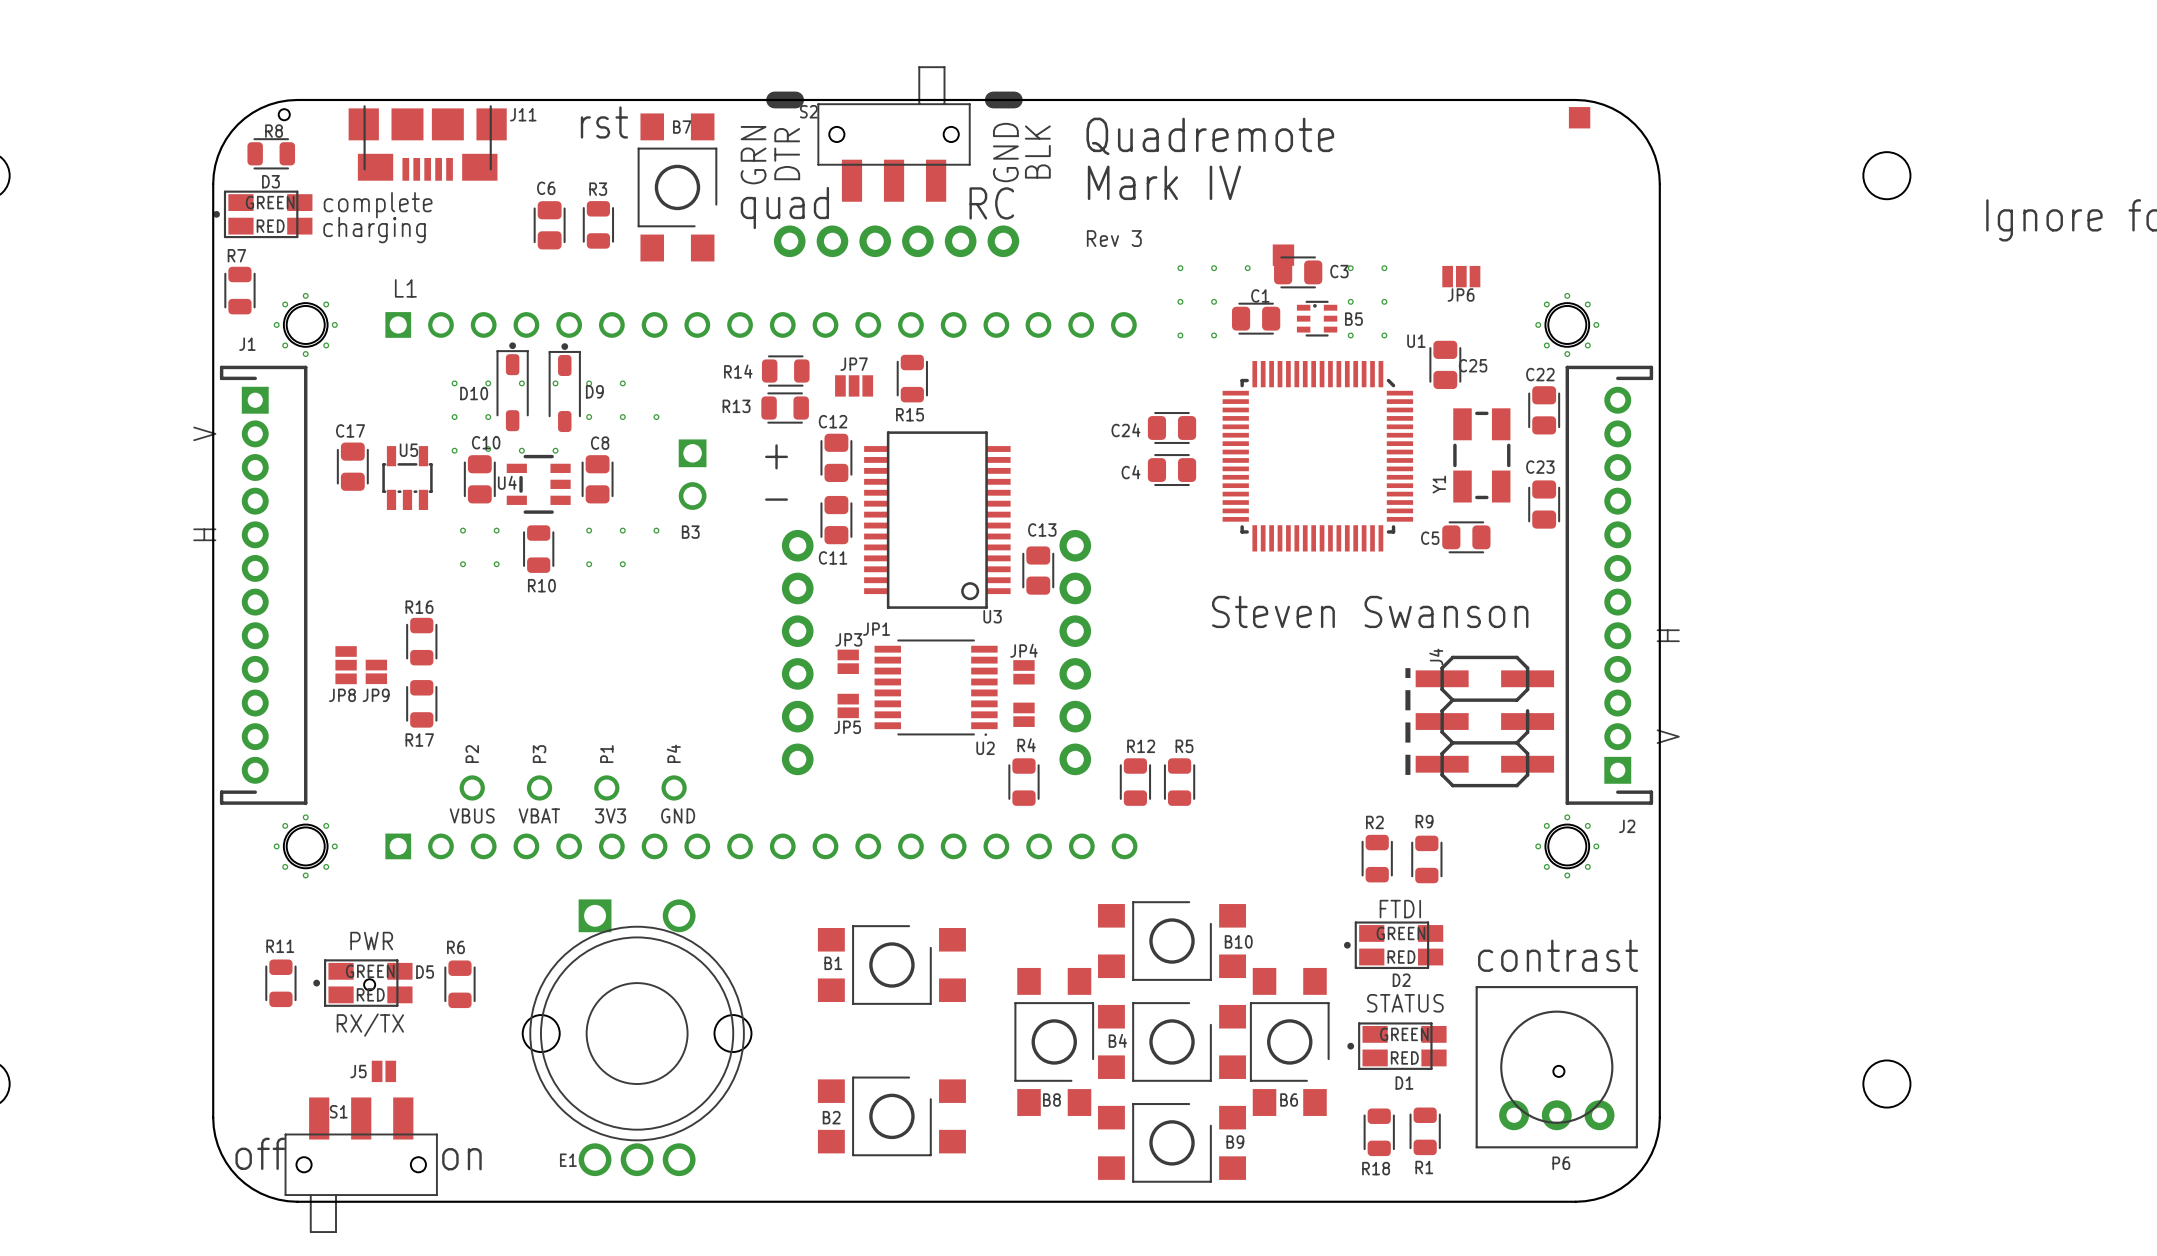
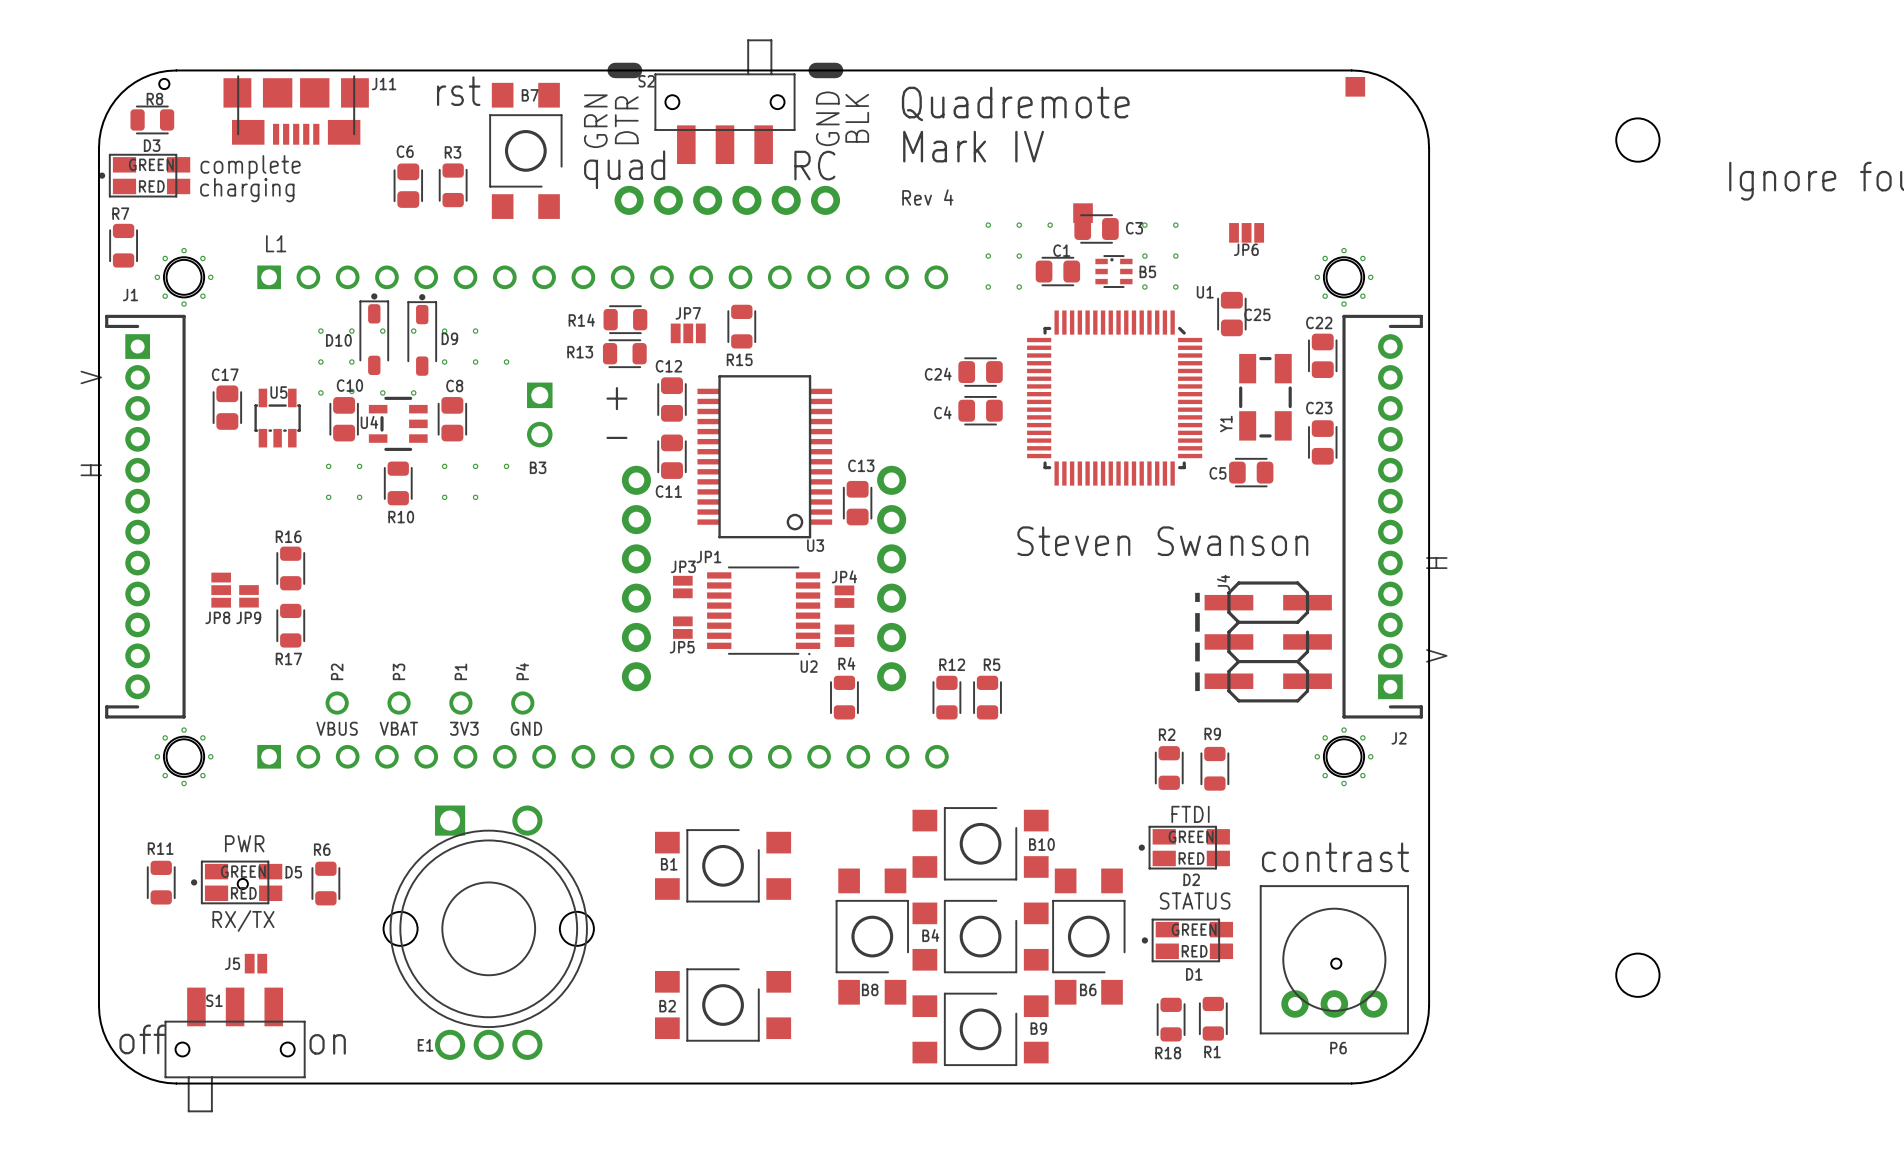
text: Rev 3 (1114, 238) -> Rev 4 (927, 197)

